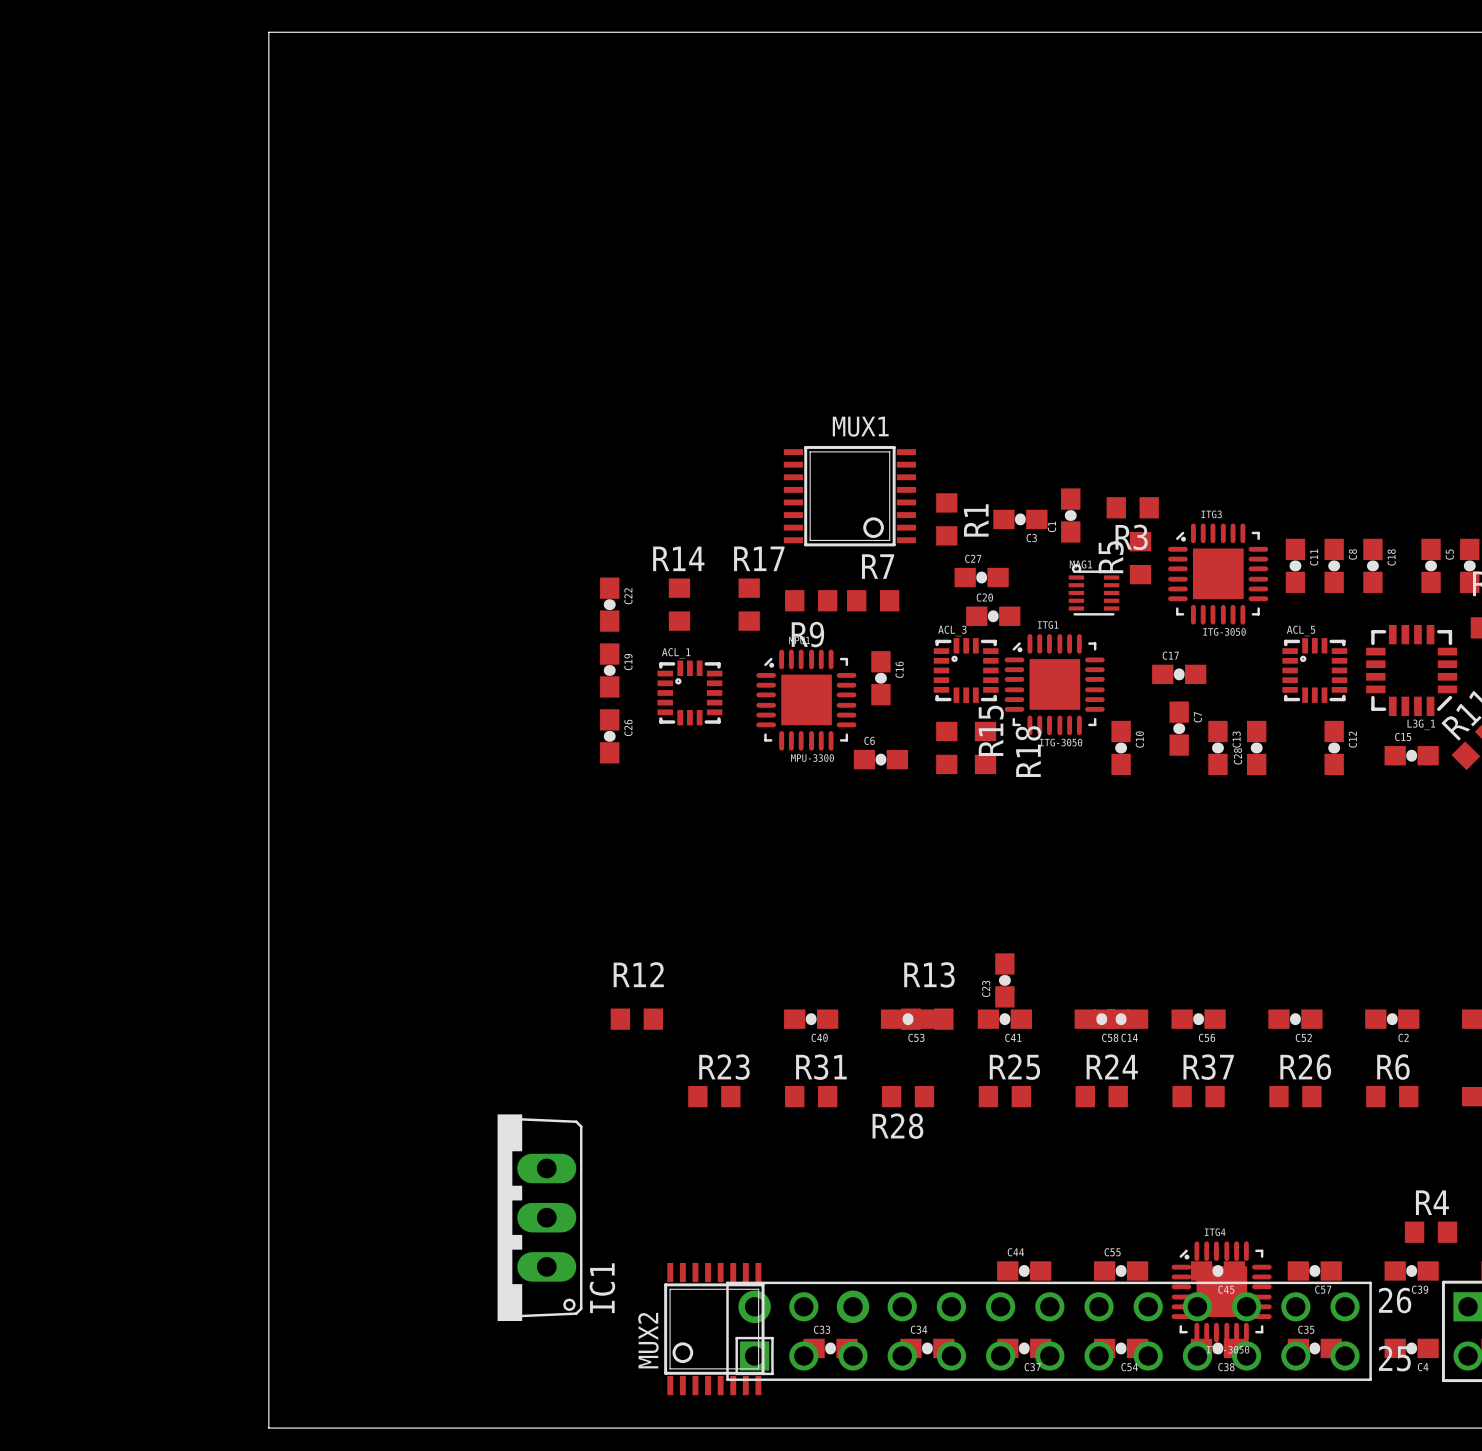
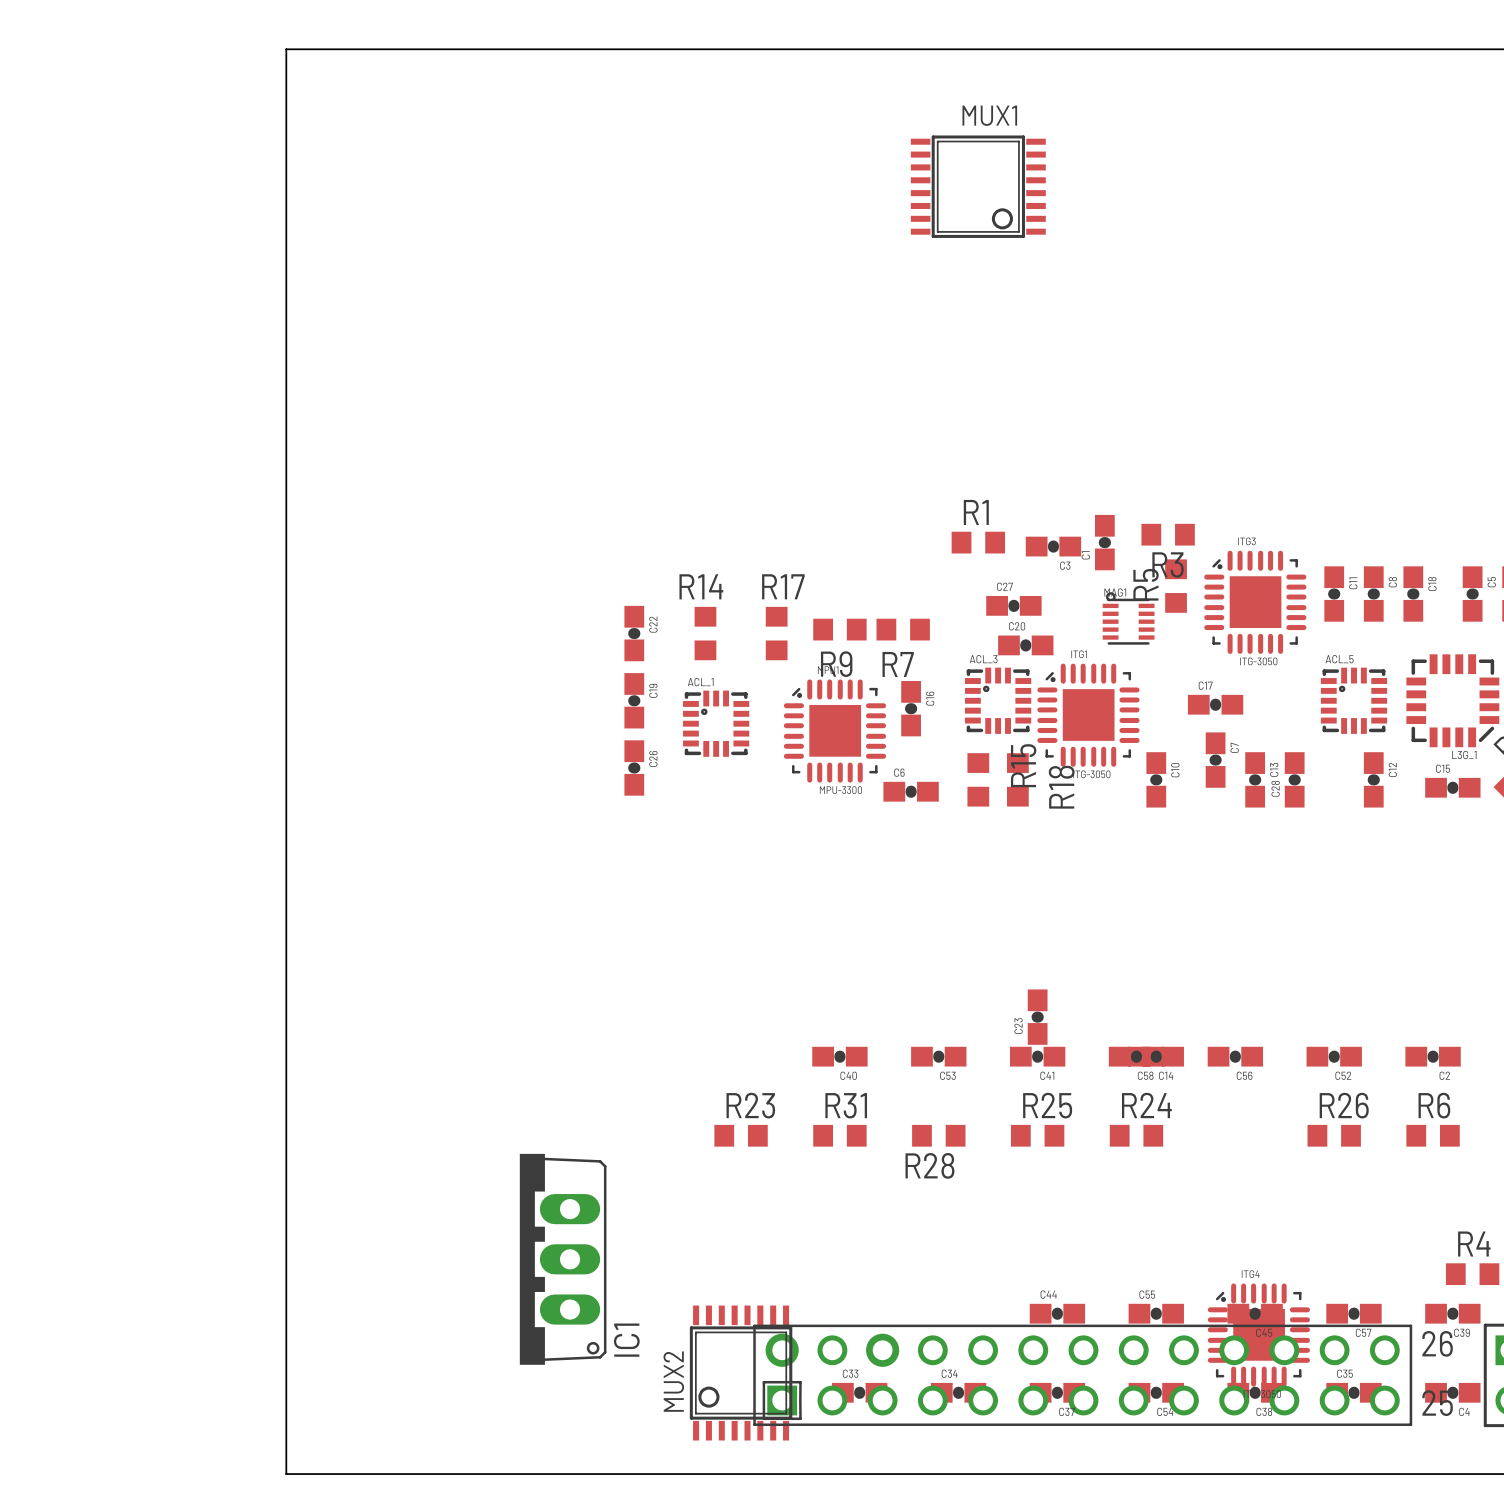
MUX1 position: (849, 496) -> (978, 186)
R1 rotation: 0° (946, 519) -> 90° clockwise (978, 542)
R1 name position: R1 (976, 520) -> R1 (976, 512)
R7 name position: R7 (878, 566) -> R7 (898, 664)
R12: (636, 1019) -> none
R13: (927, 1019) -> none
R37: (1198, 1096) -> none

